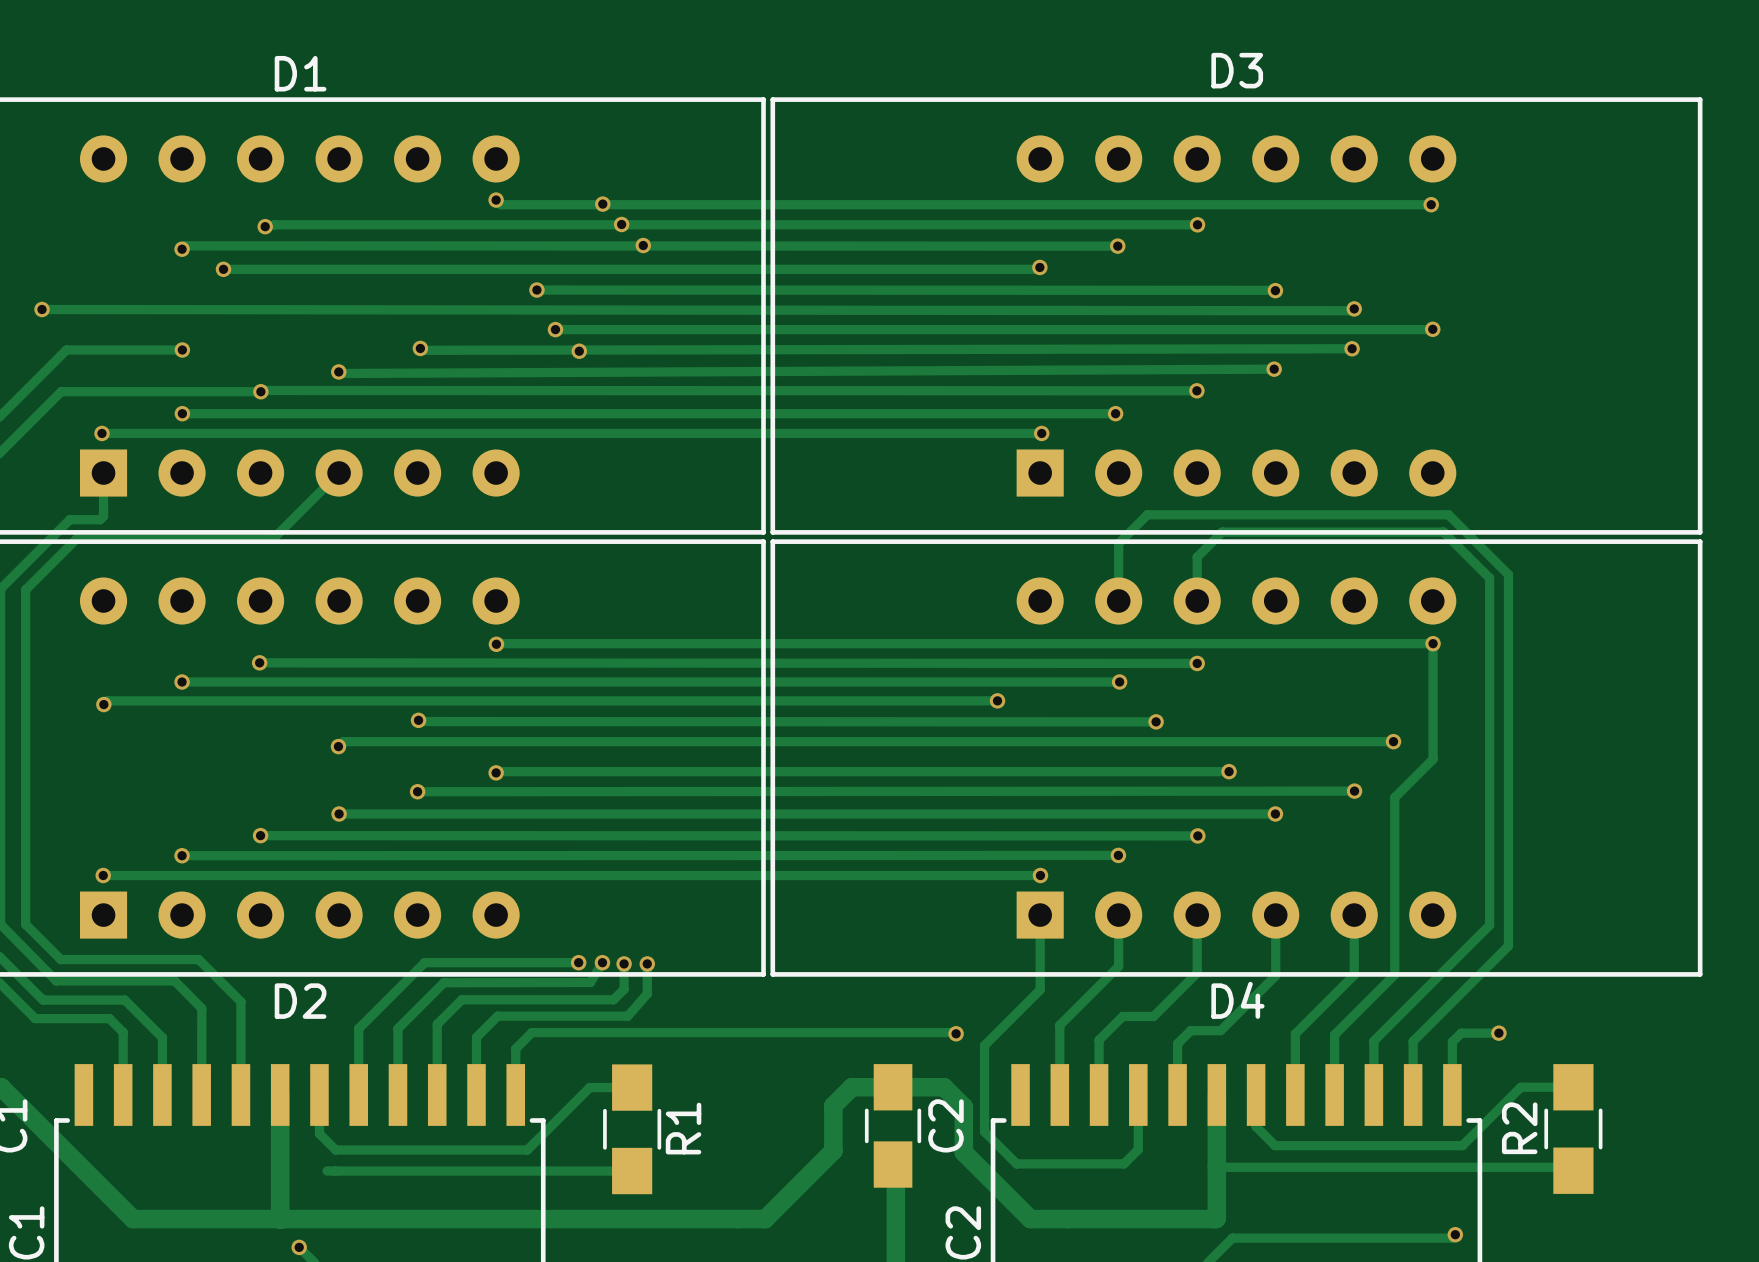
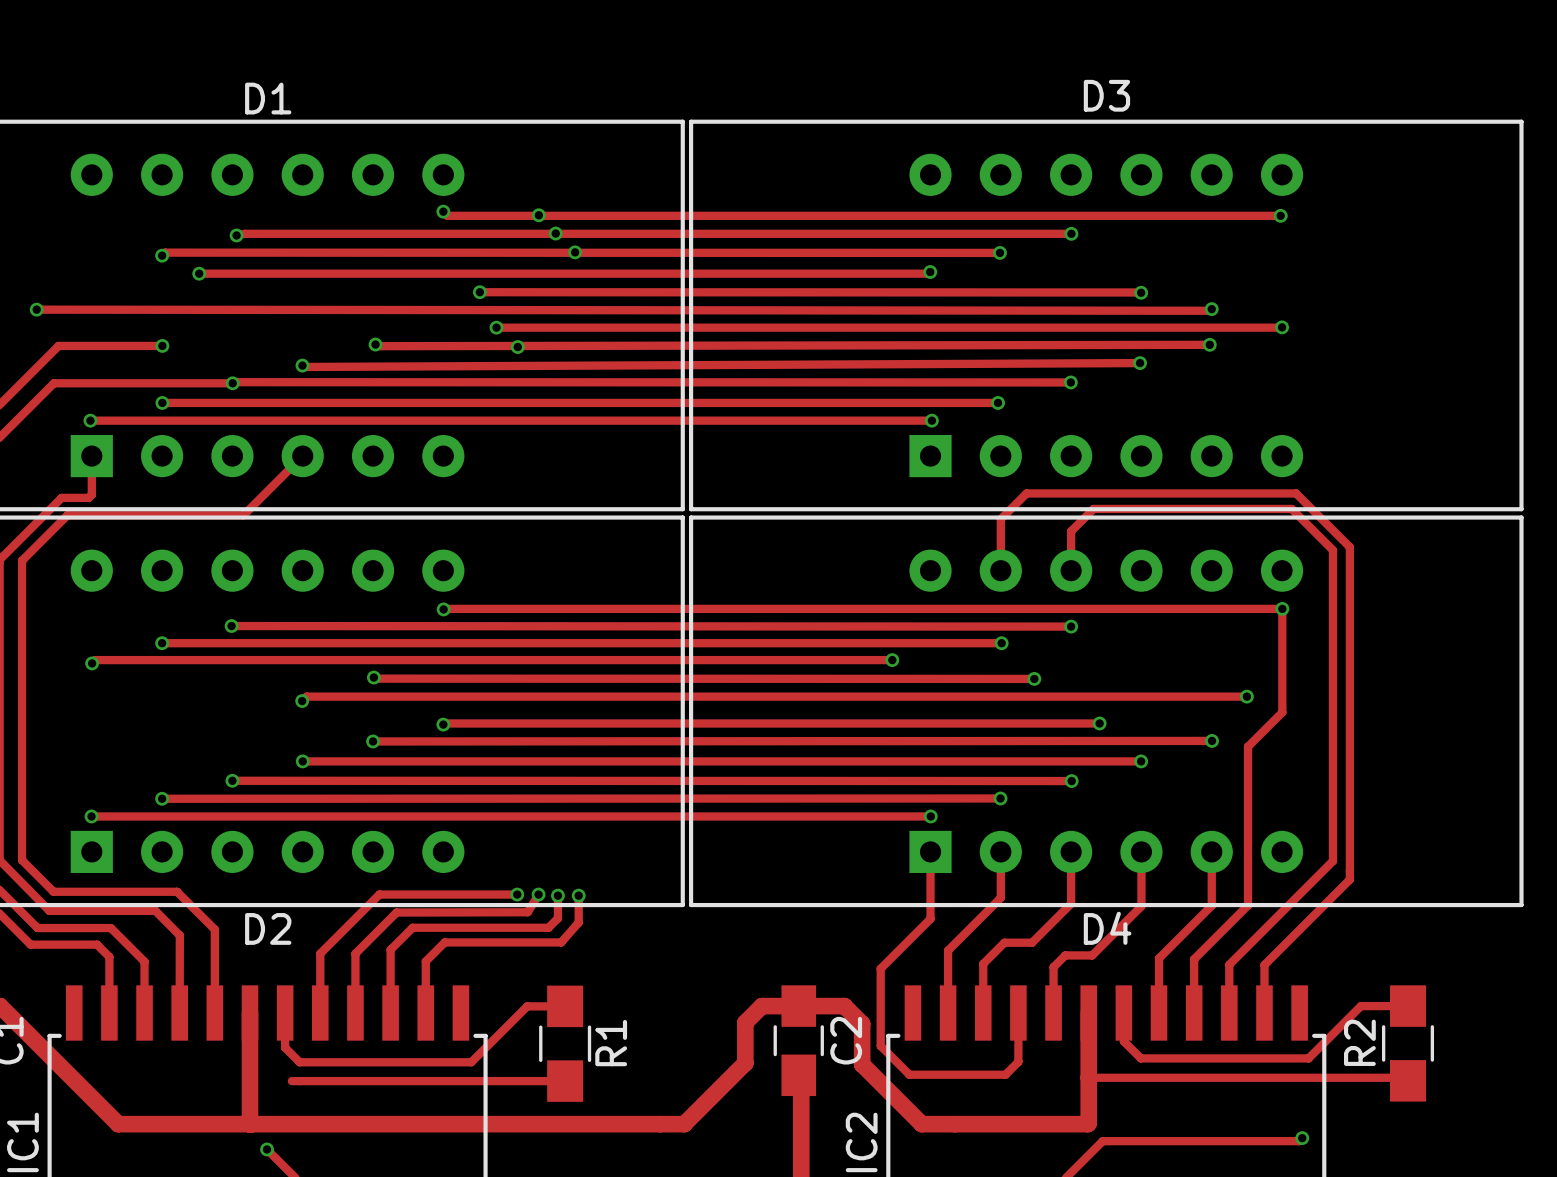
track: (957, 1032) (531, 1032) (515, 1048) (515, 1094) -> none
via: (956, 1033) -> none
track: (1498, 1033) (1461, 1033) (1452, 1041) (1452, 1094) -> none
via: (1498, 1033) -> none

